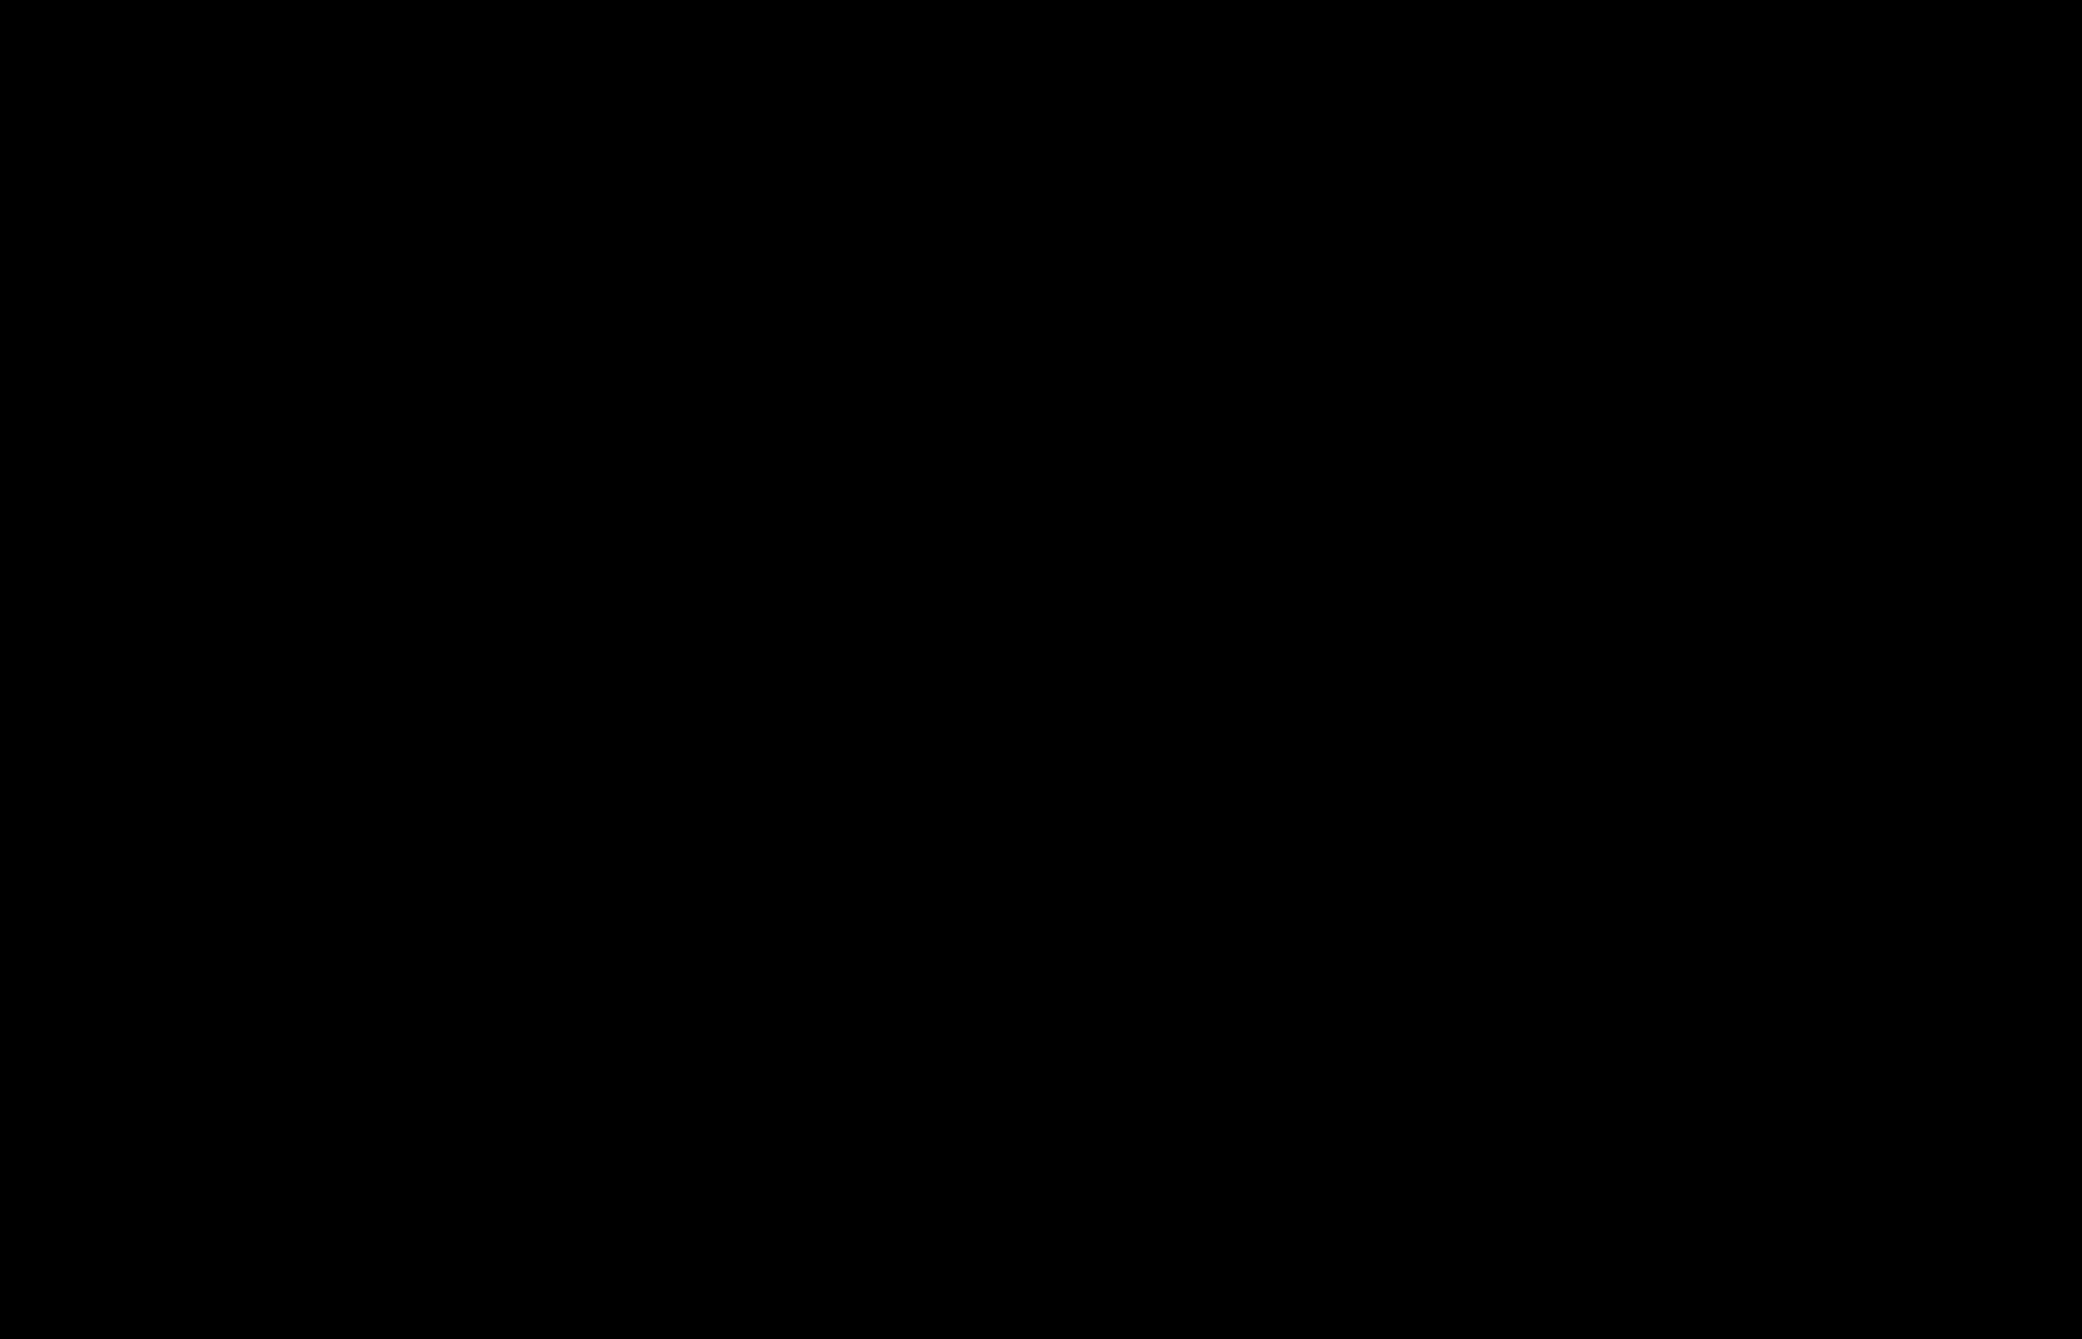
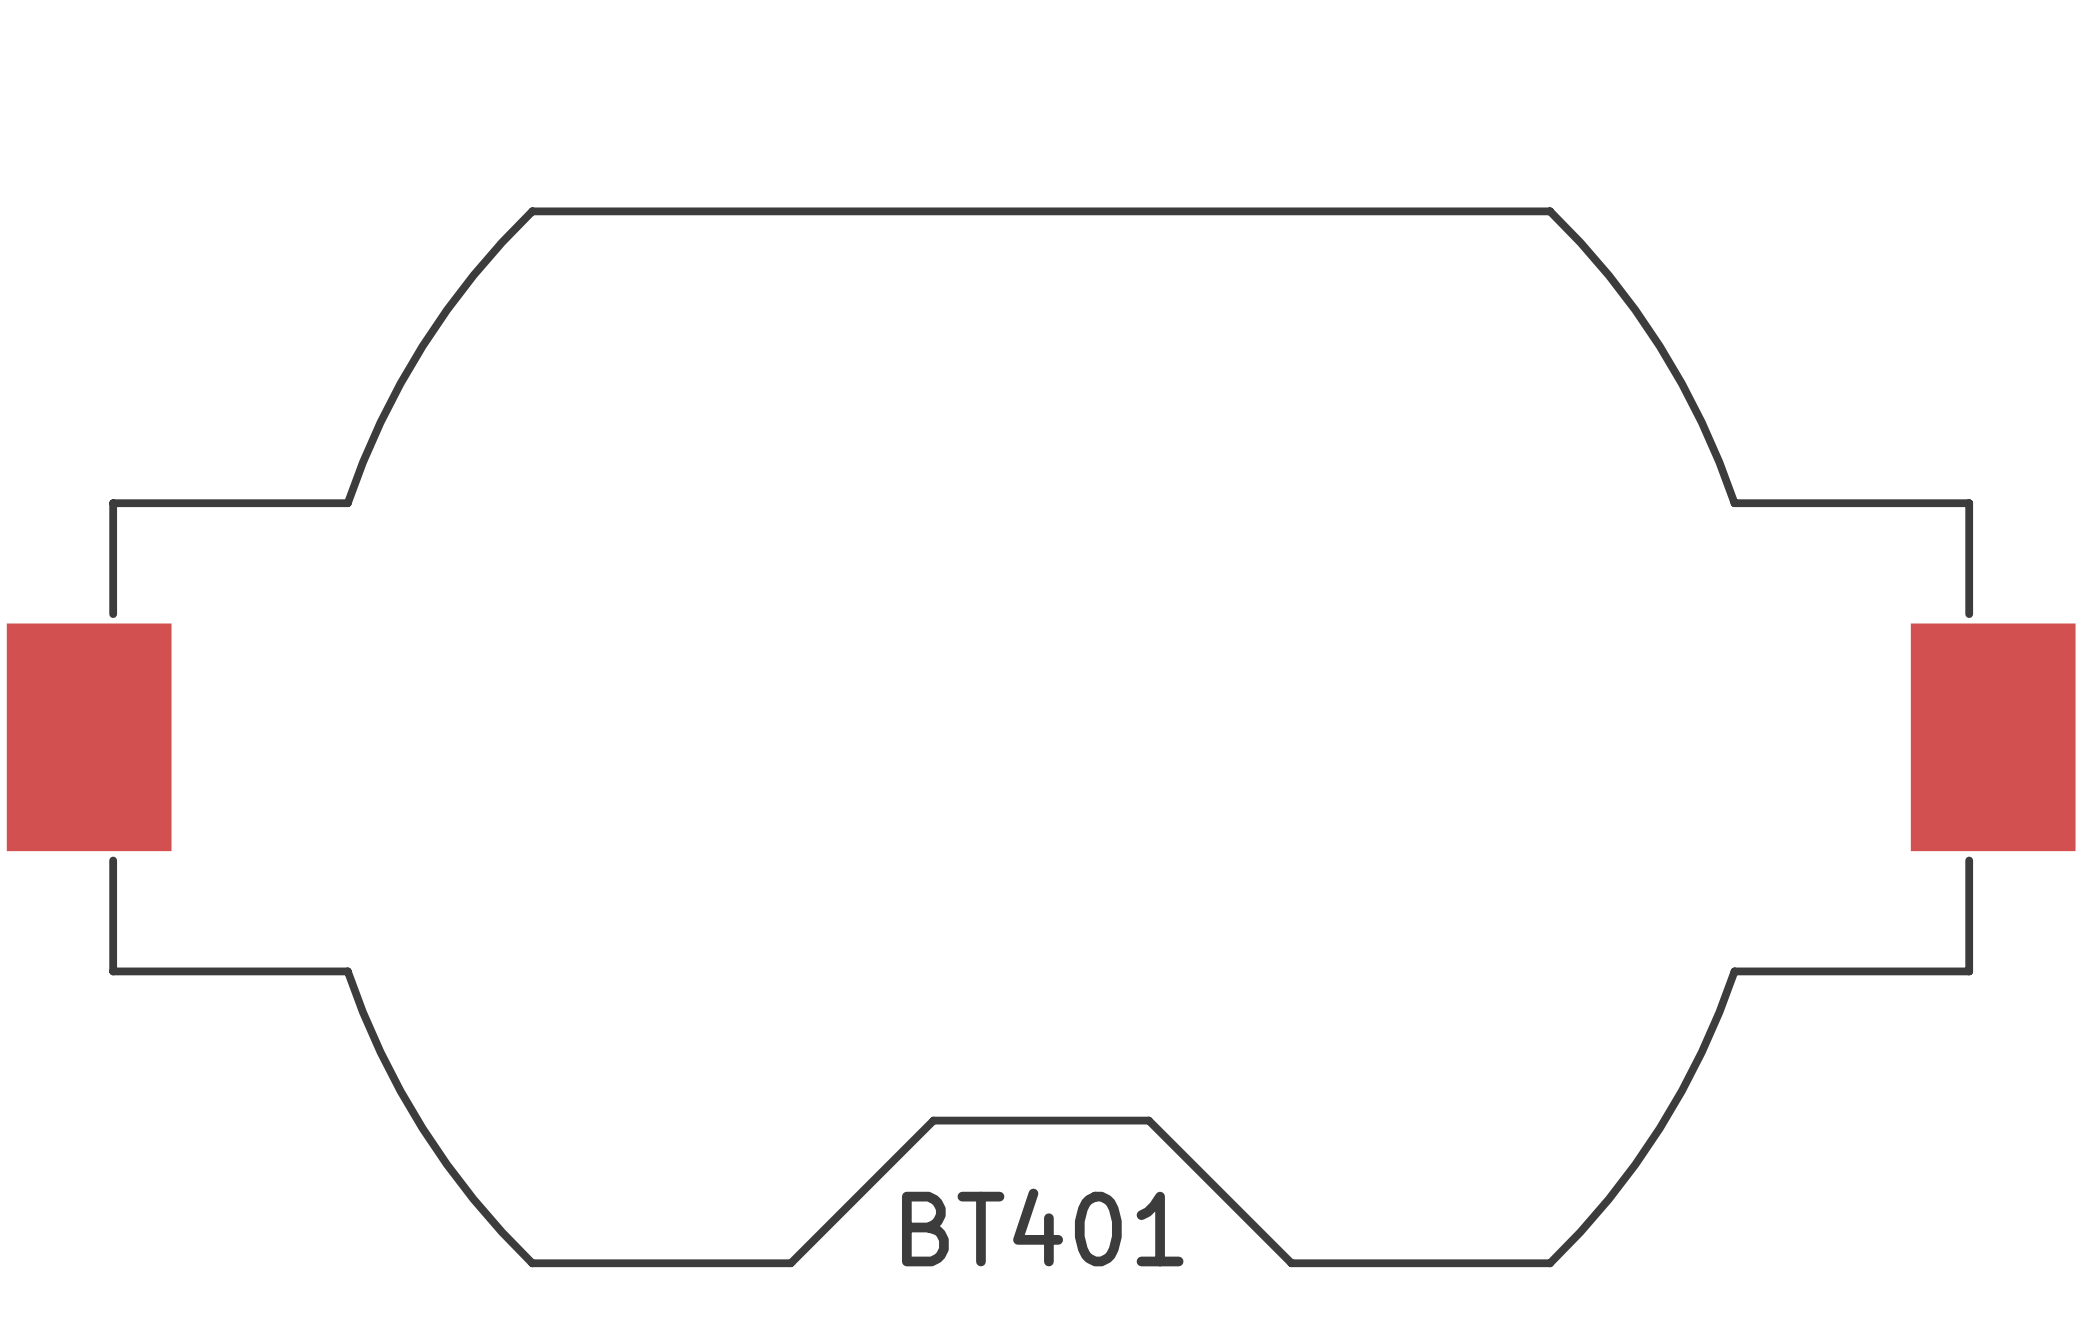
BT401: none -> (1041, 737)

